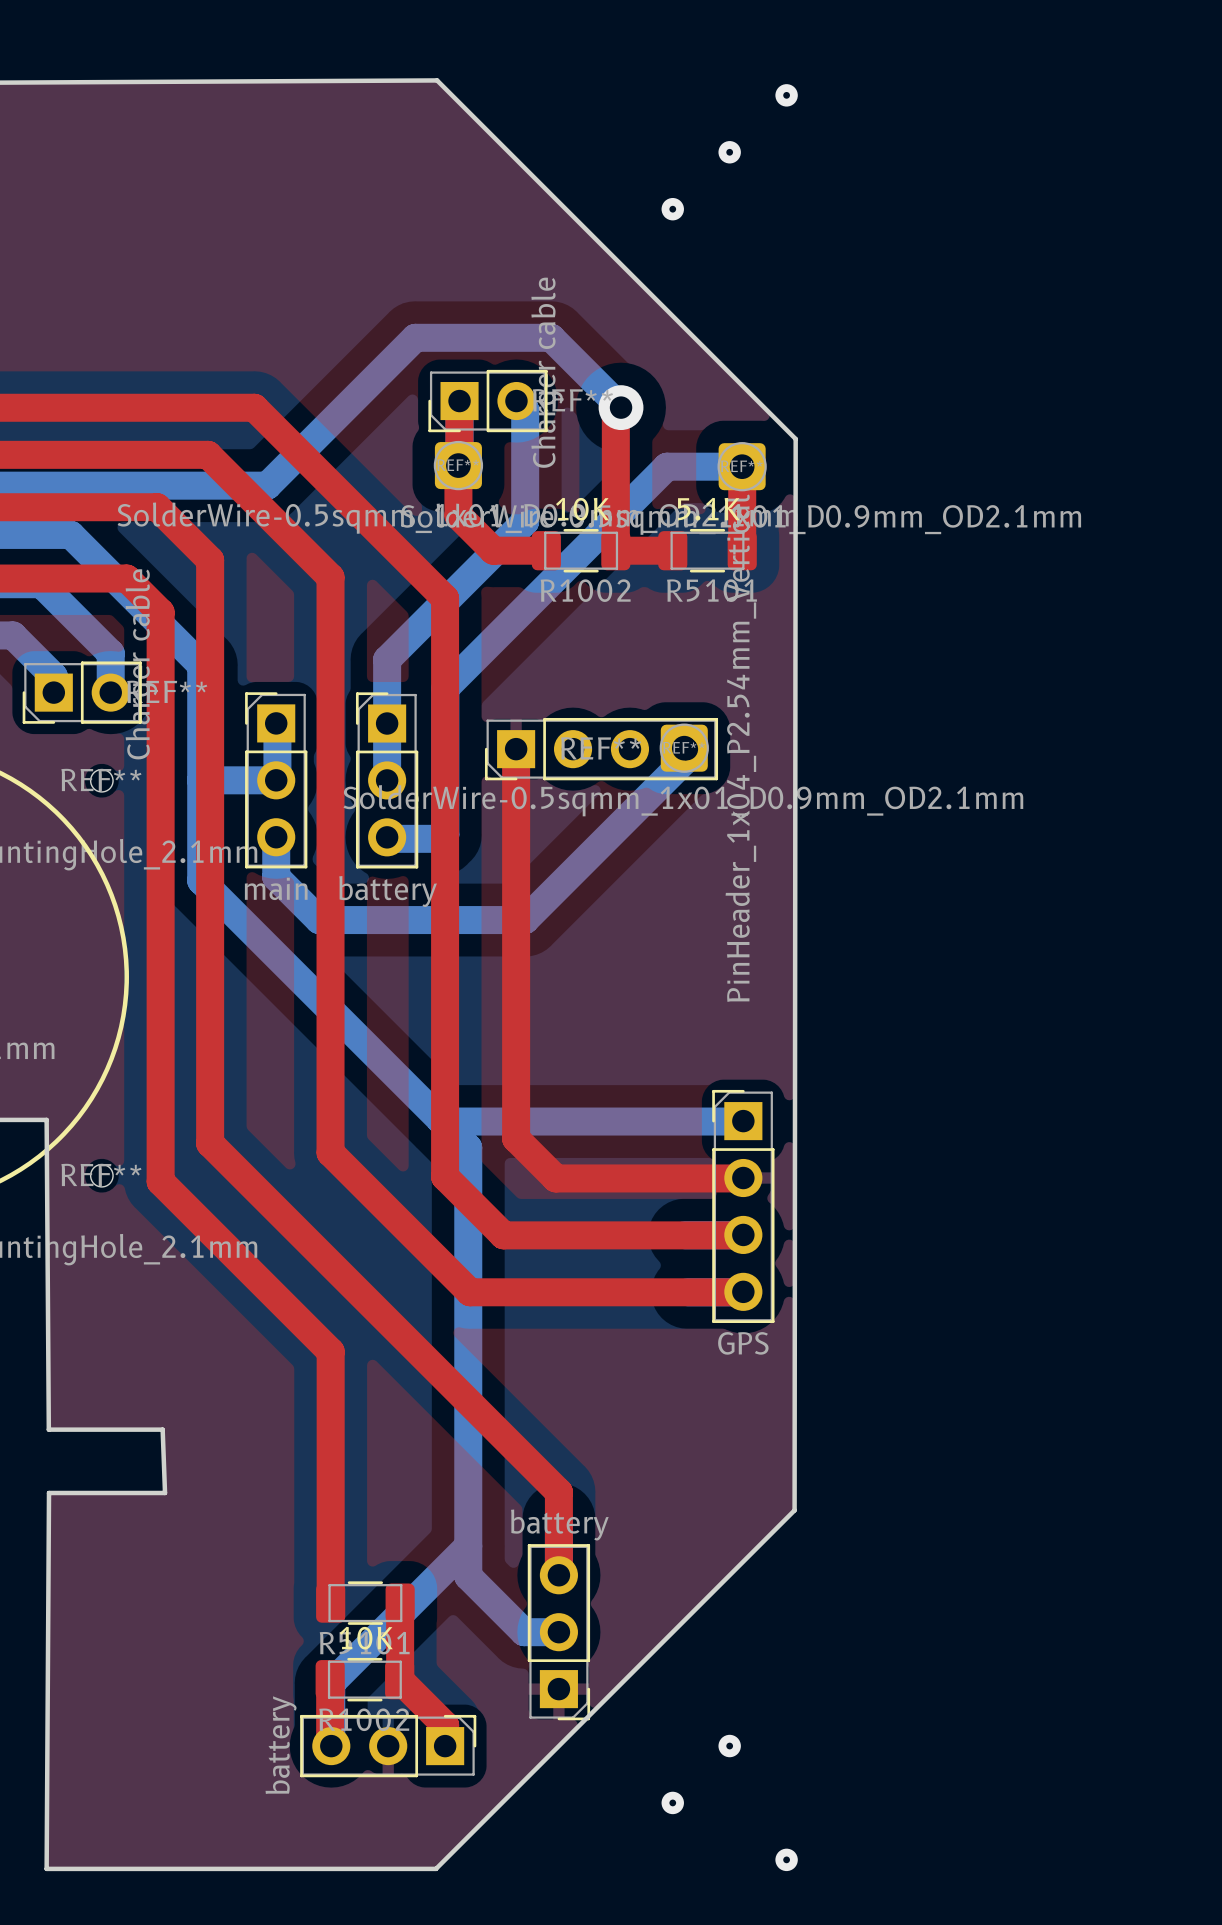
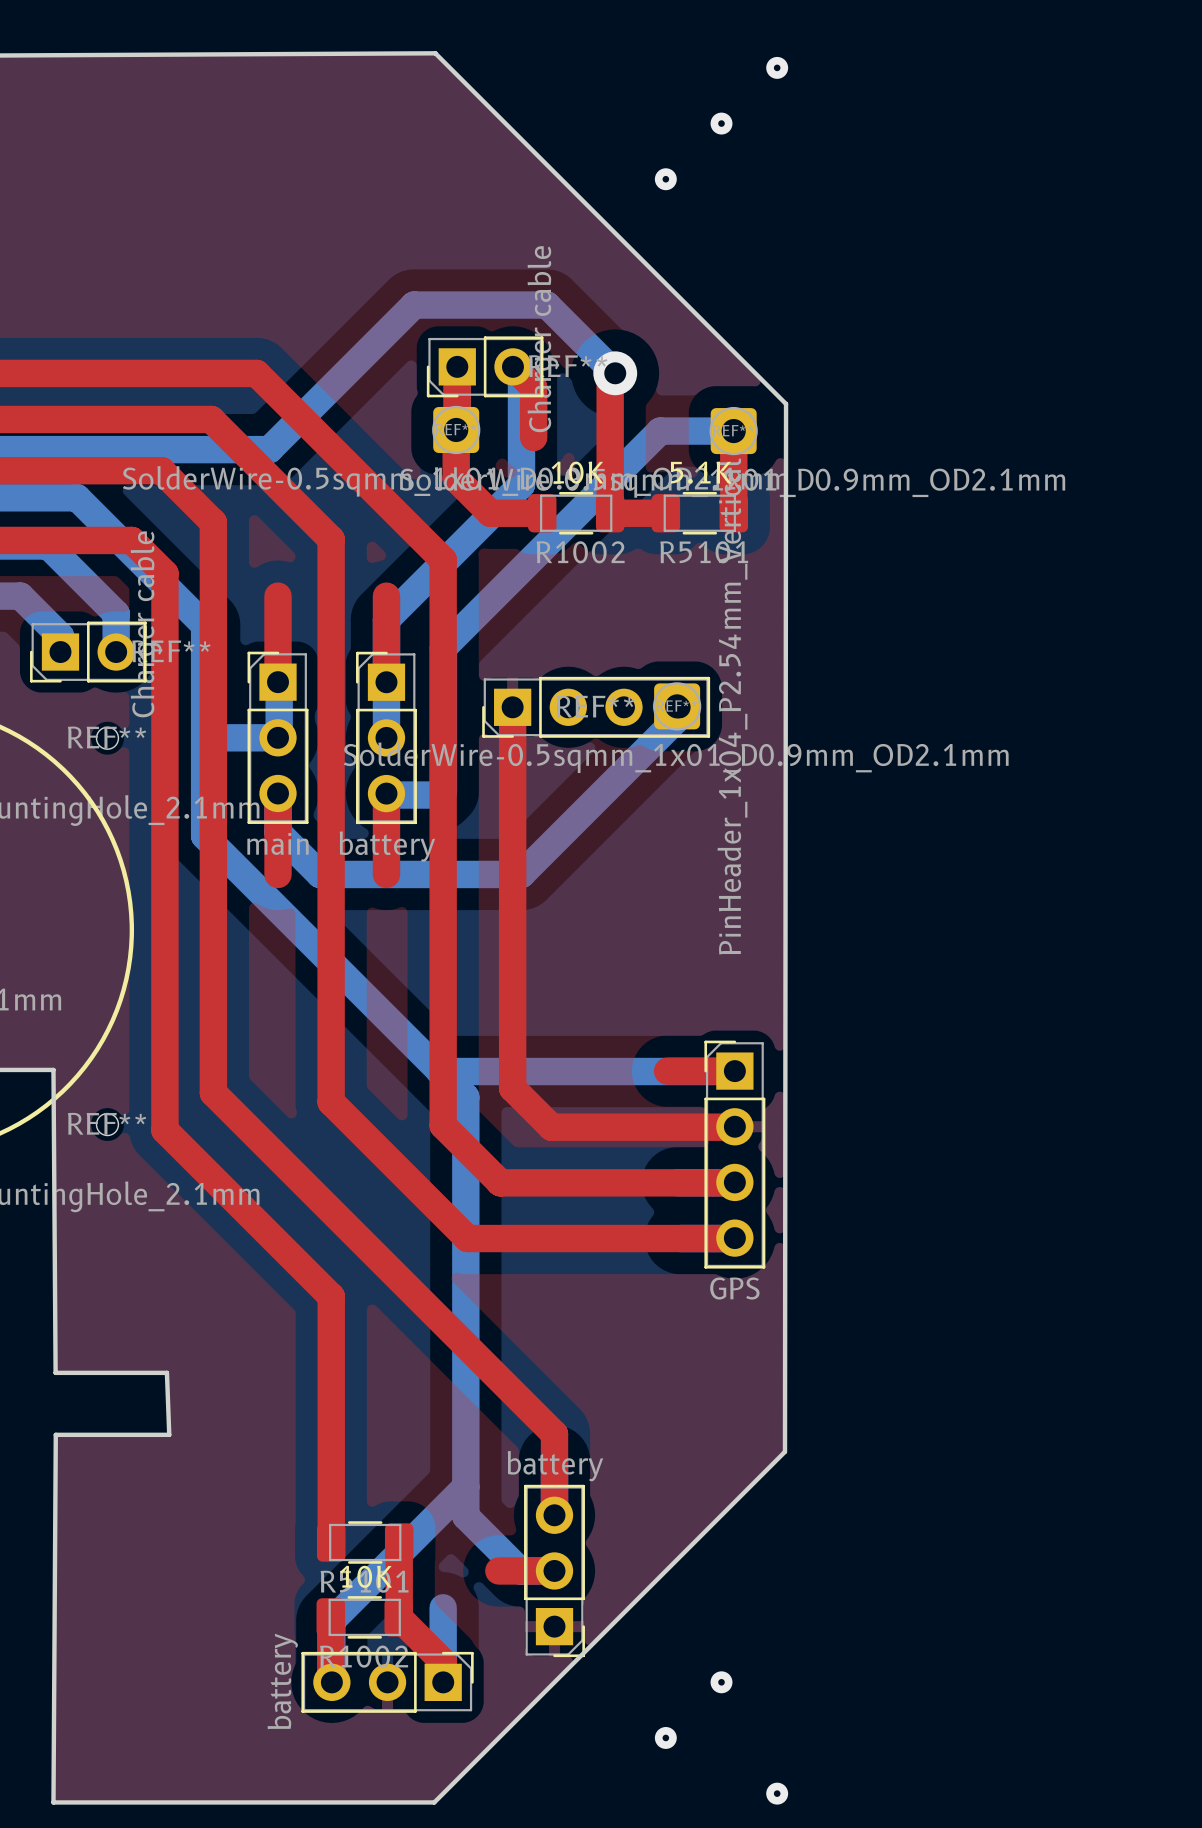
top track: none -> (512, 366) (533, 387) (533, 437)
top track: none -> (278, 596) (278, 682)
top track: none -> (386, 596) (386, 682)
top track: none -> (278, 793) (278, 874)
top track: none -> (386, 793) (386, 874)
top track: none -> (667, 1071) (734, 1071)
top track: none -> (498, 1570) (554, 1570)
bottom track: none -> (443, 1607) (443, 1682)

